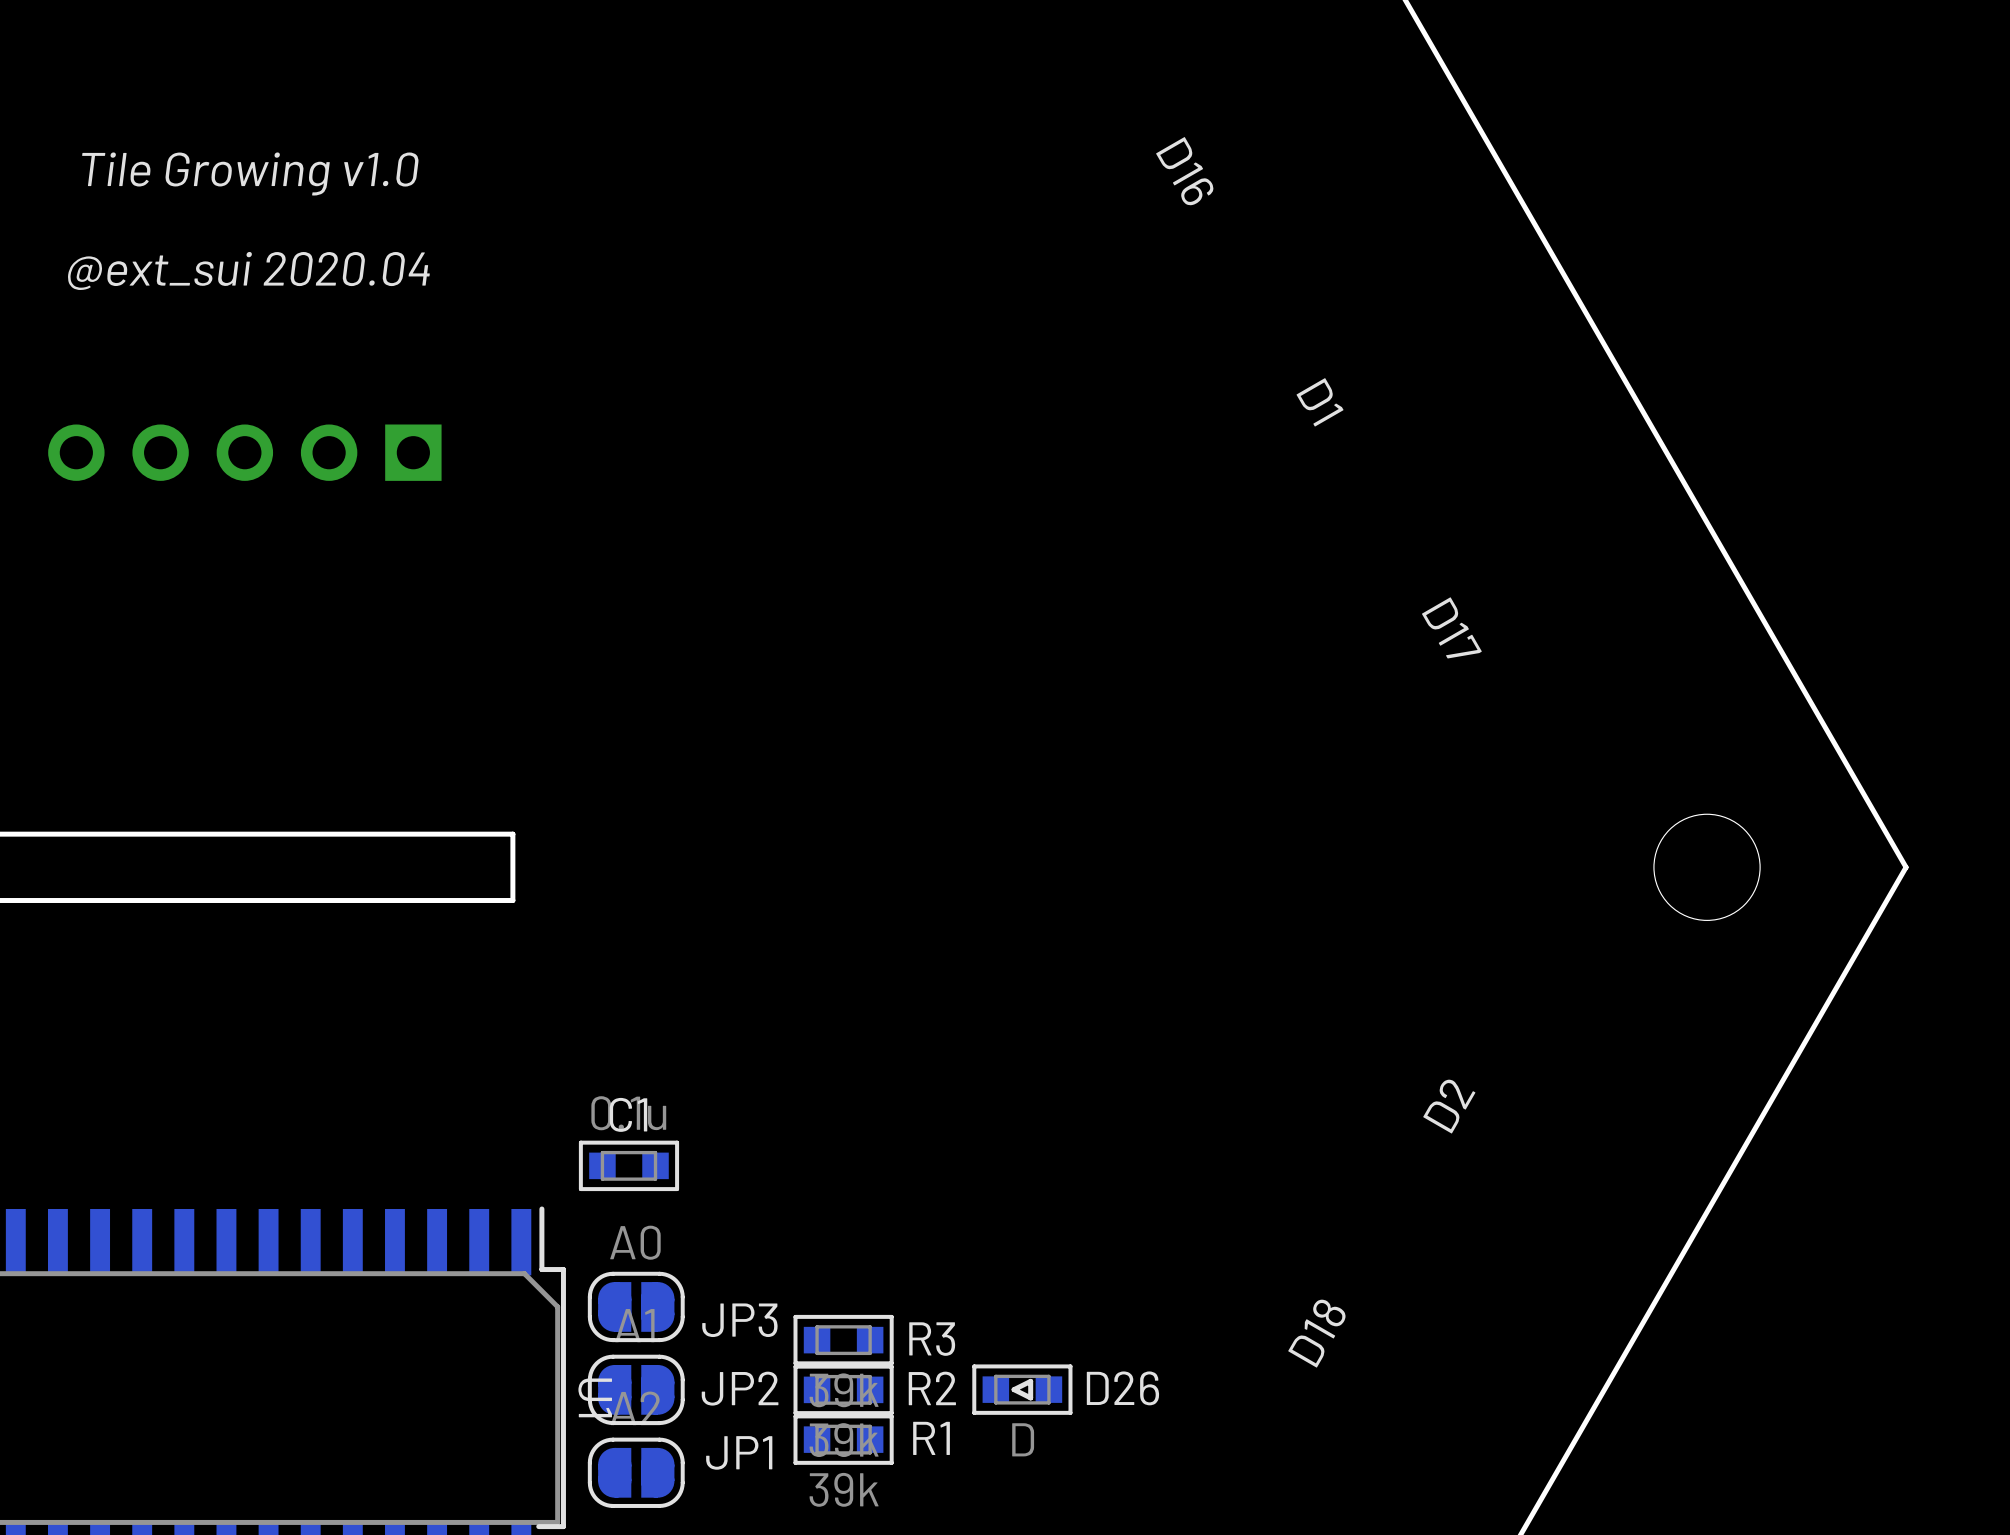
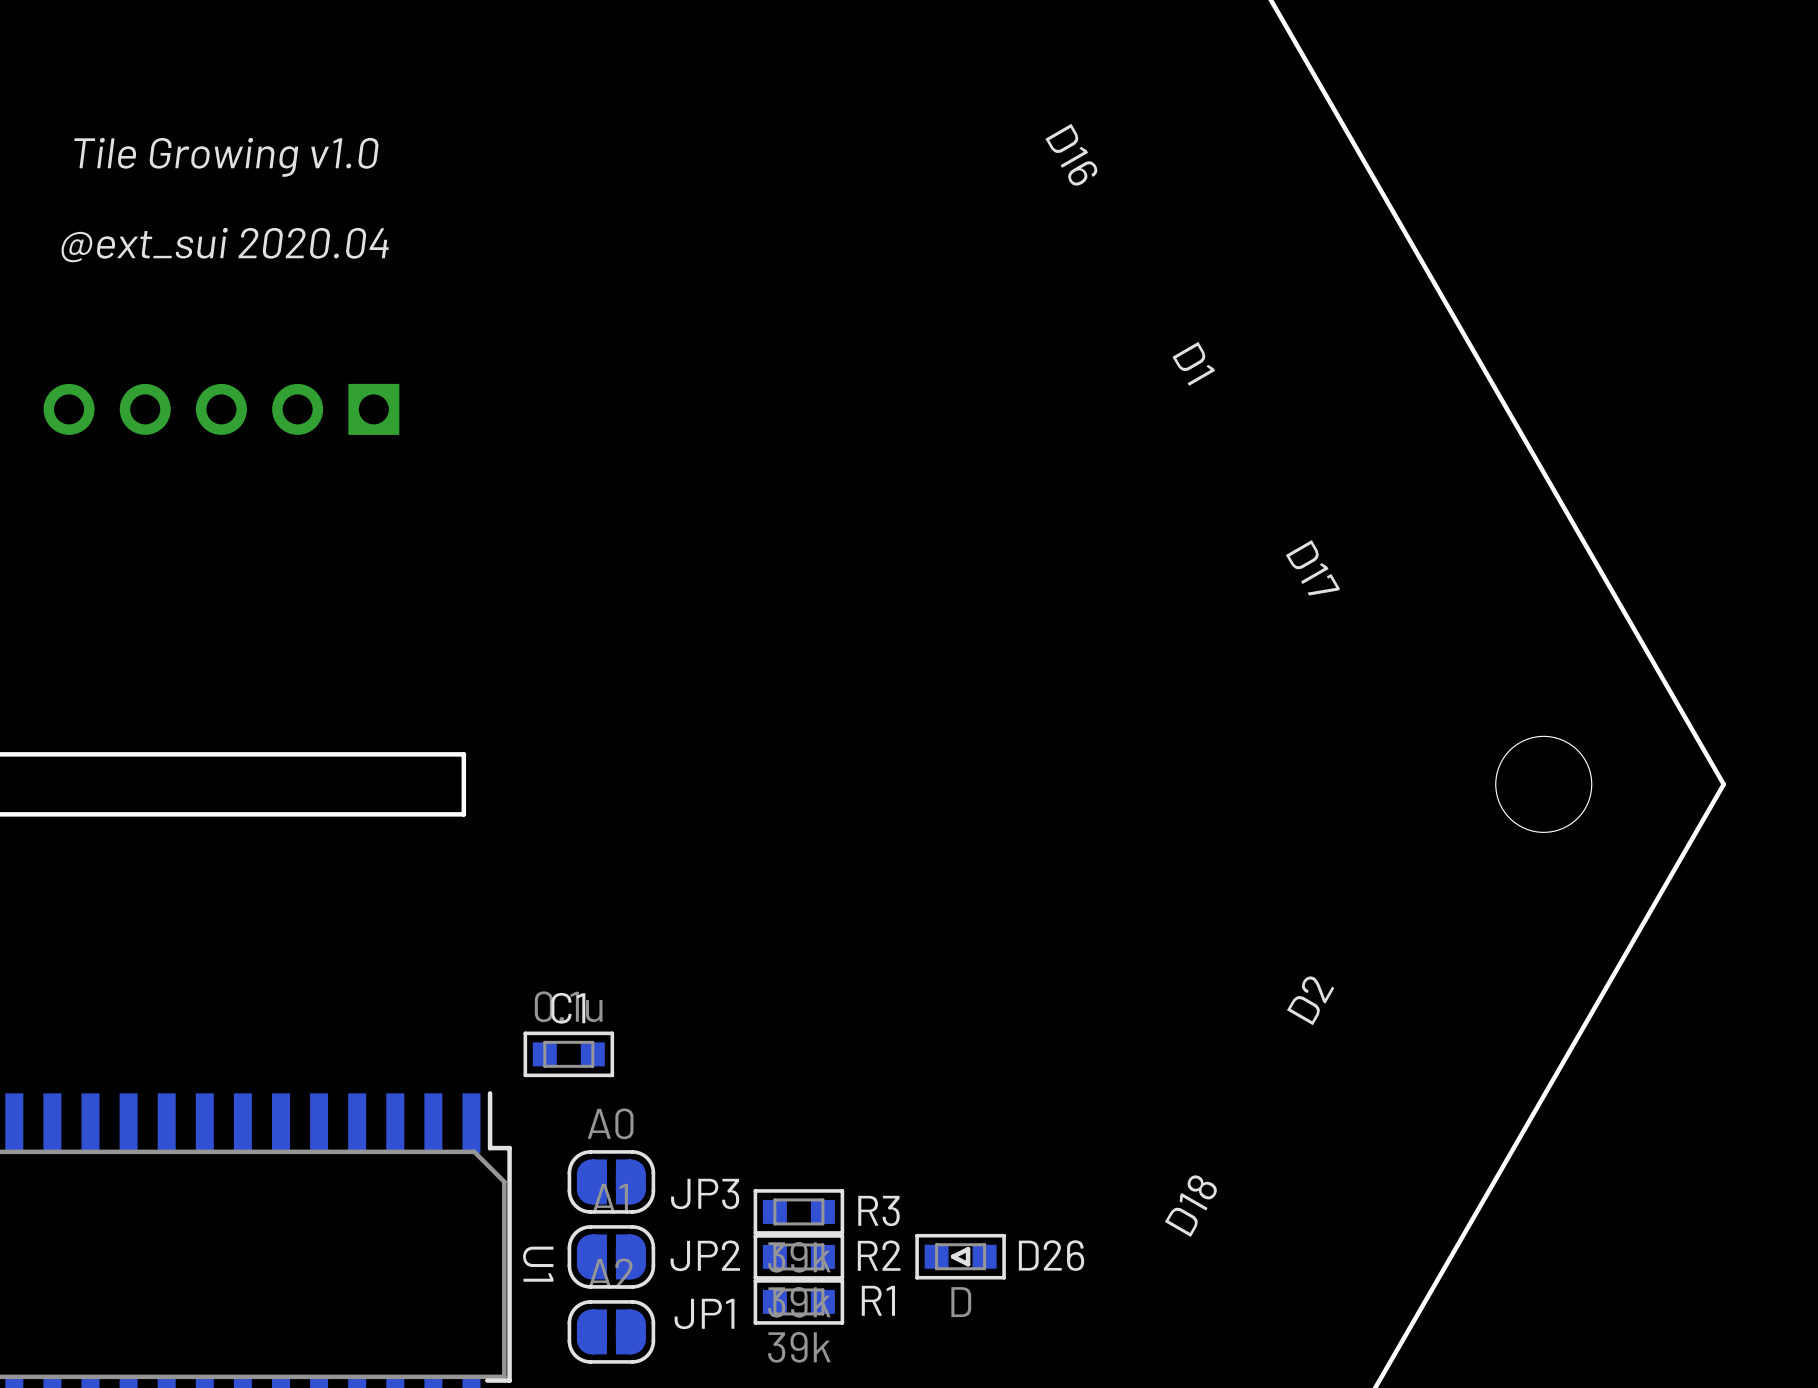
JP3 position: (636, 1306) -> (611, 1181)
R3 position: (843, 1340) -> (798, 1211)
JP2 position: (636, 1389) -> (611, 1256)
R2 position: (843, 1389) -> (798, 1256)
D26 position: (1022, 1389) -> (960, 1256)
R1 position: (843, 1439) -> (798, 1301)
JP1 position: (636, 1472) -> (611, 1331)

